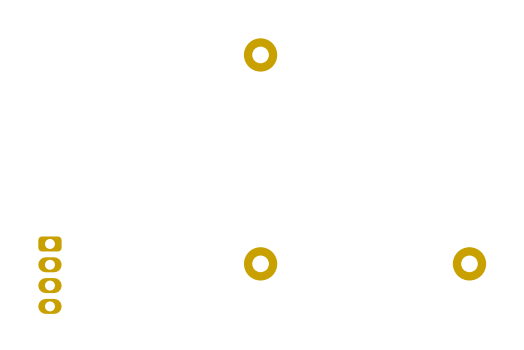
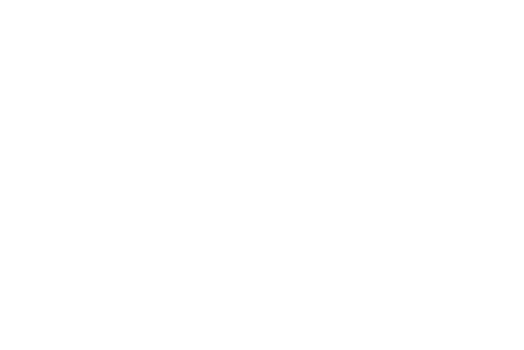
part: (260, 54) -> none
part: (260, 263) -> none
part: (469, 263) -> none
part: (49, 275) -> none

